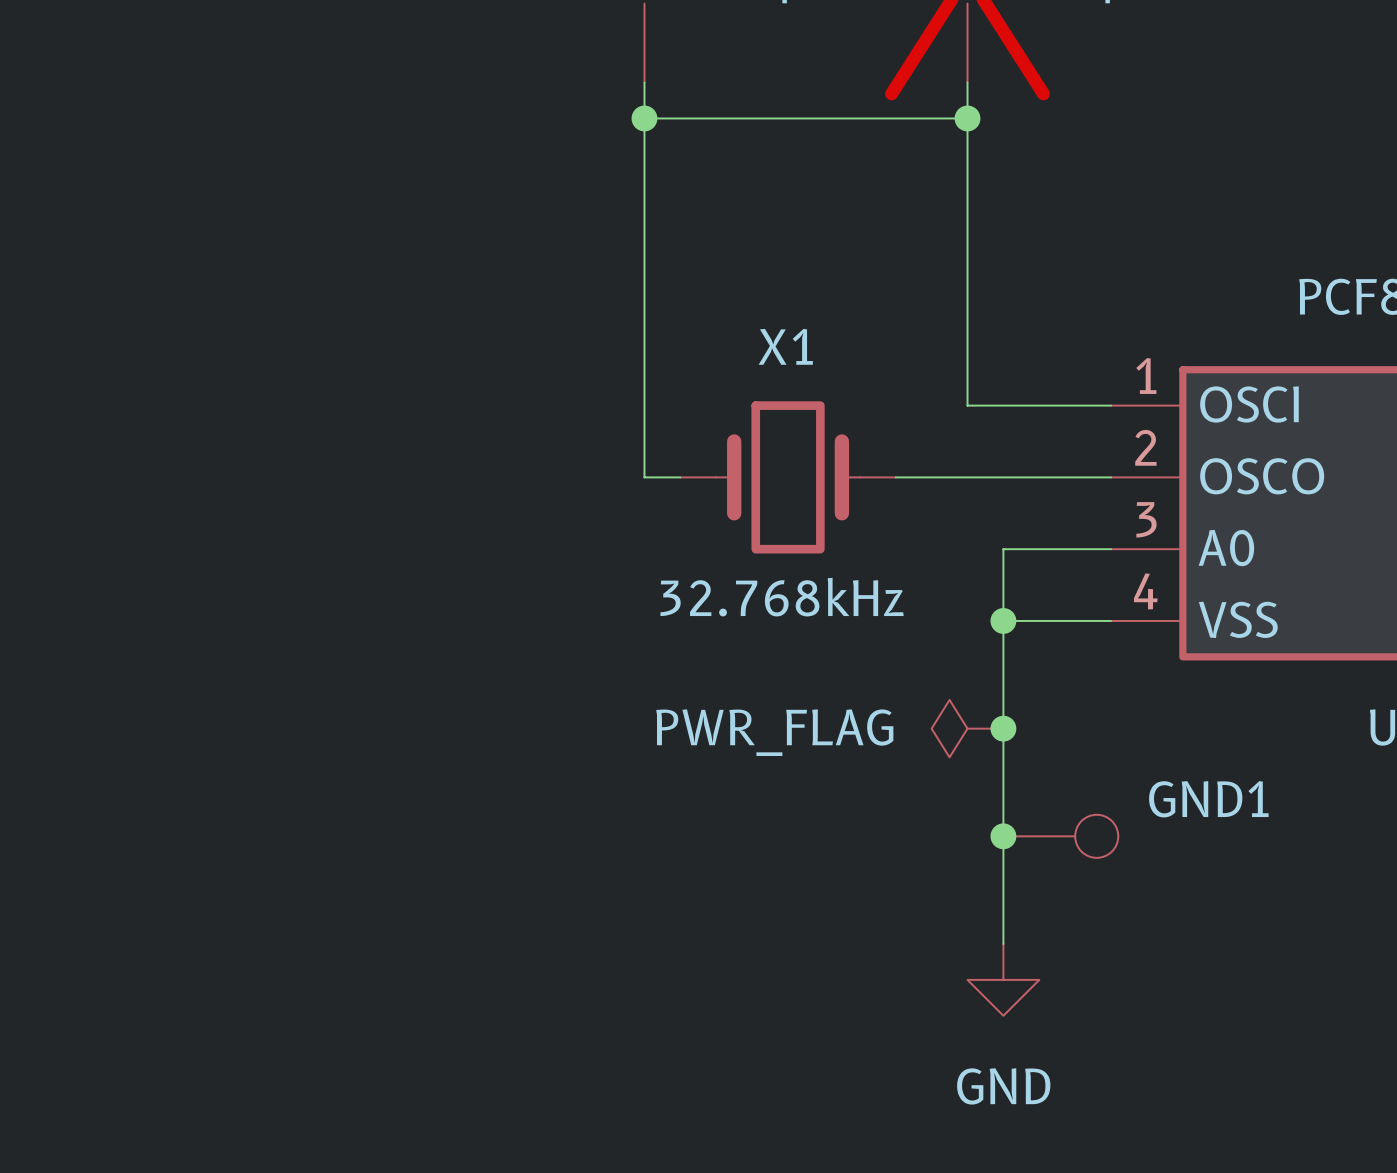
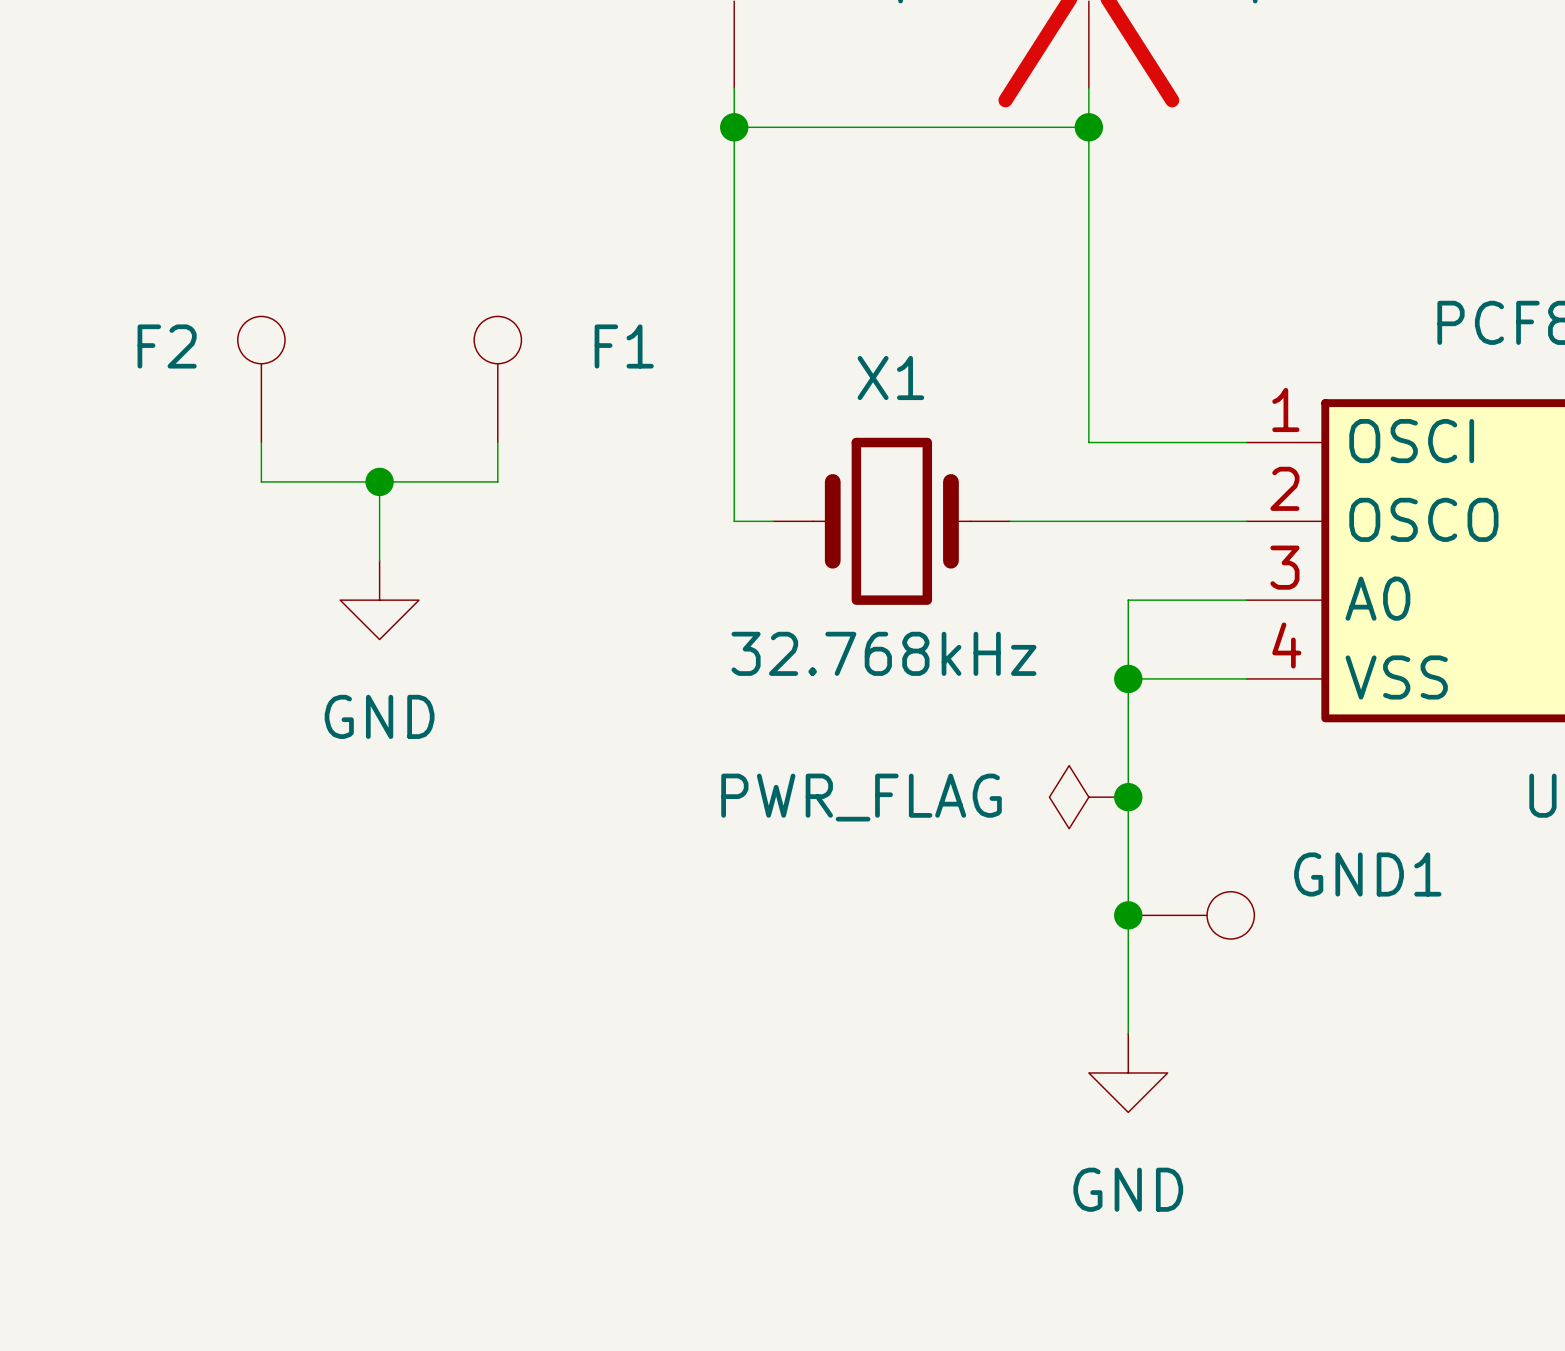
F2: none -> (261, 379)
F1: none -> (497, 379)
wire: none -> (261, 442) (261, 481) (497, 481) (497, 442)
wire: none -> (379, 481) (379, 560)
junction: none -> (379, 481)
power symbol: none -> GND (379, 600)

